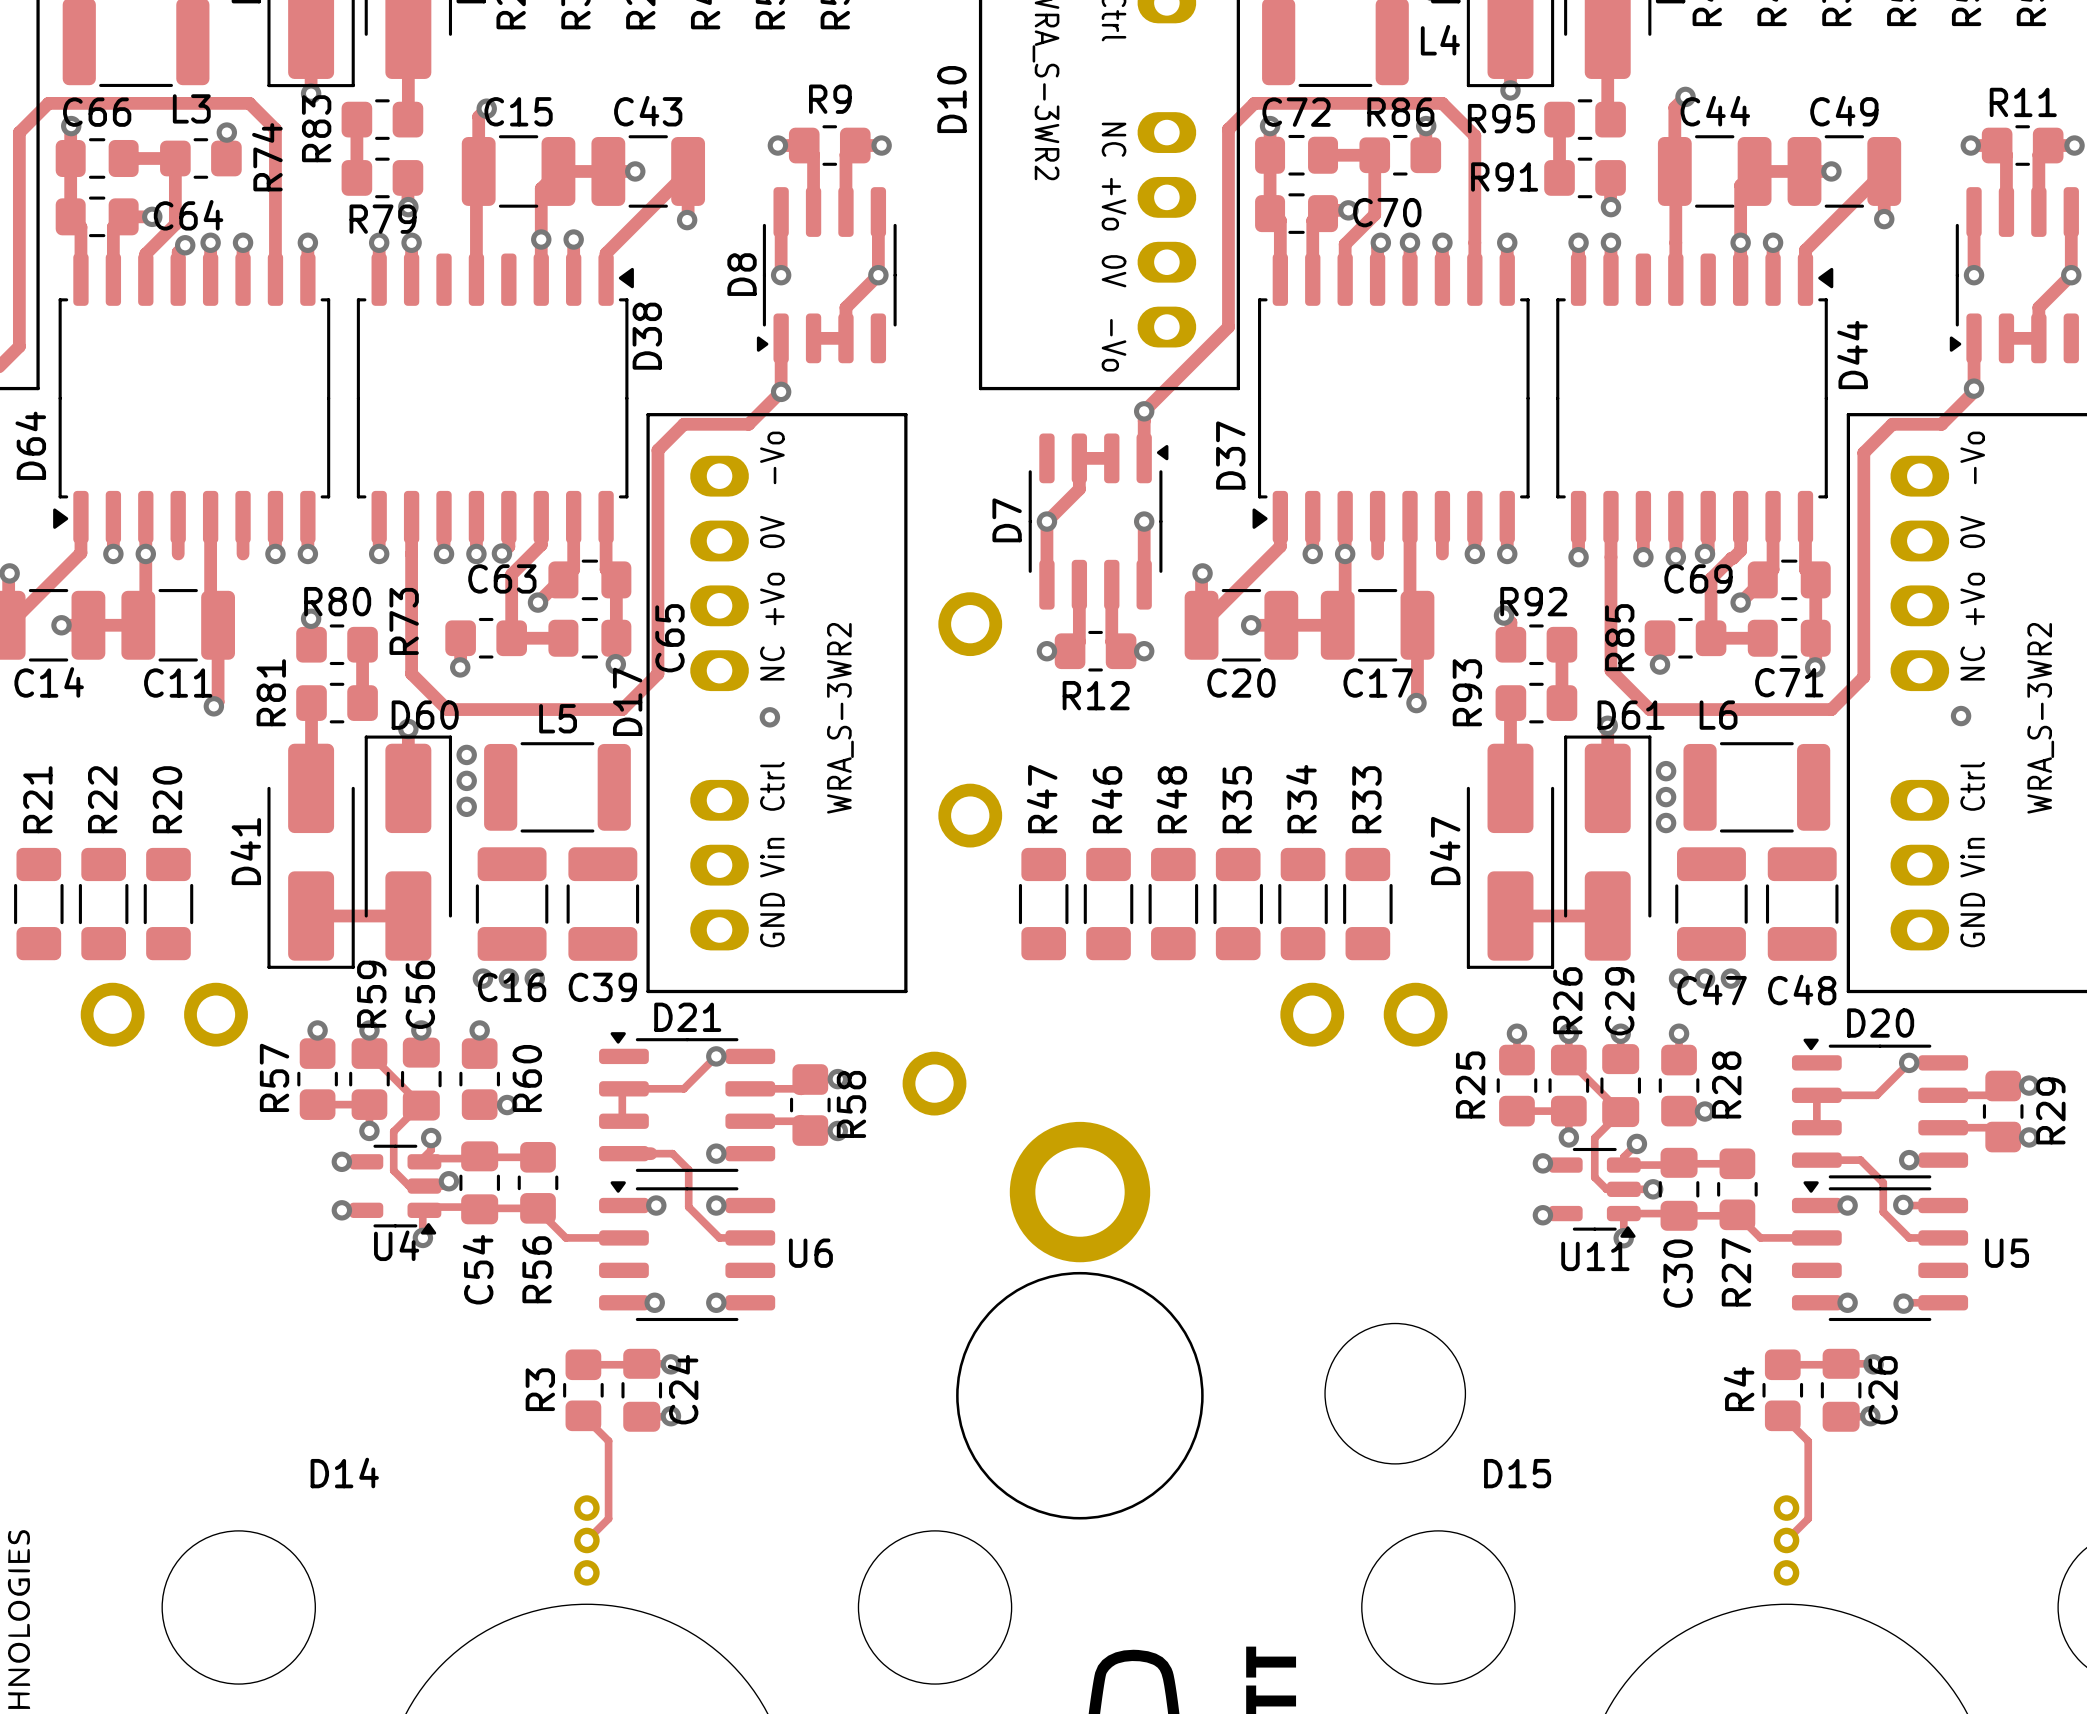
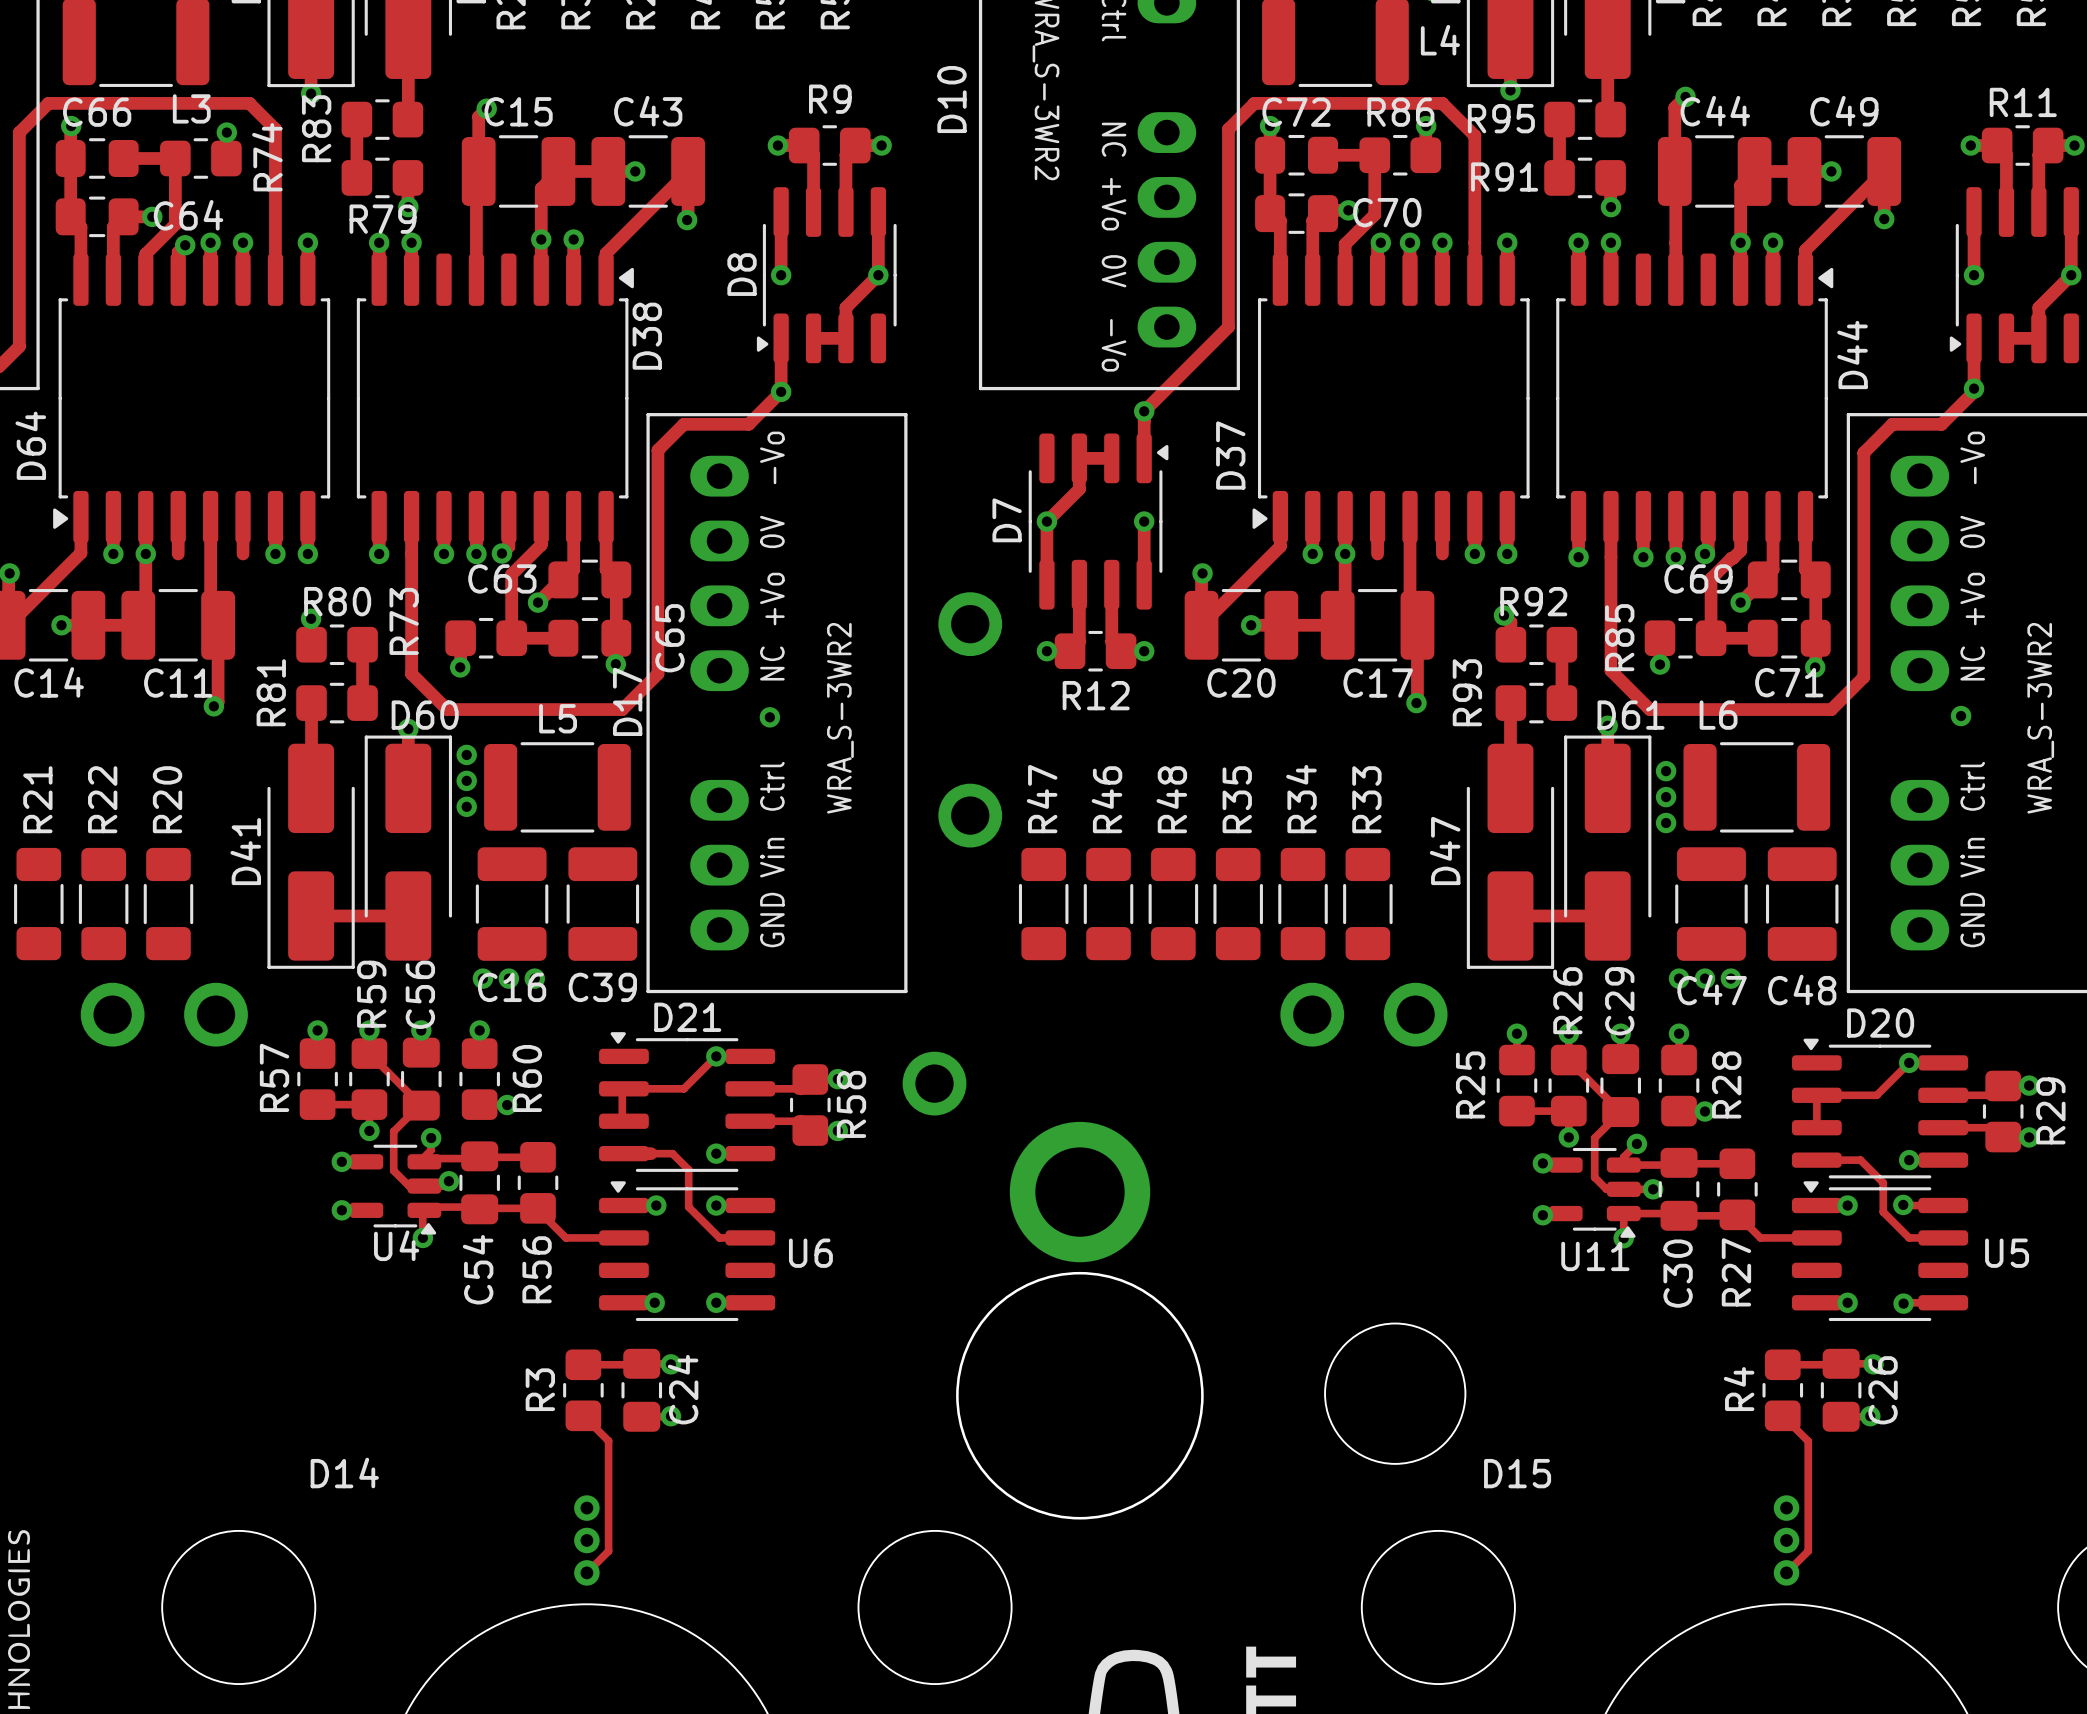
track: (608, 1518) (586, 1540) -> (608, 1518) (608, 1551) (586, 1572)
track: (1808, 1518) (1786, 1540) -> (1808, 1518) (1808, 1551) (1786, 1572)

